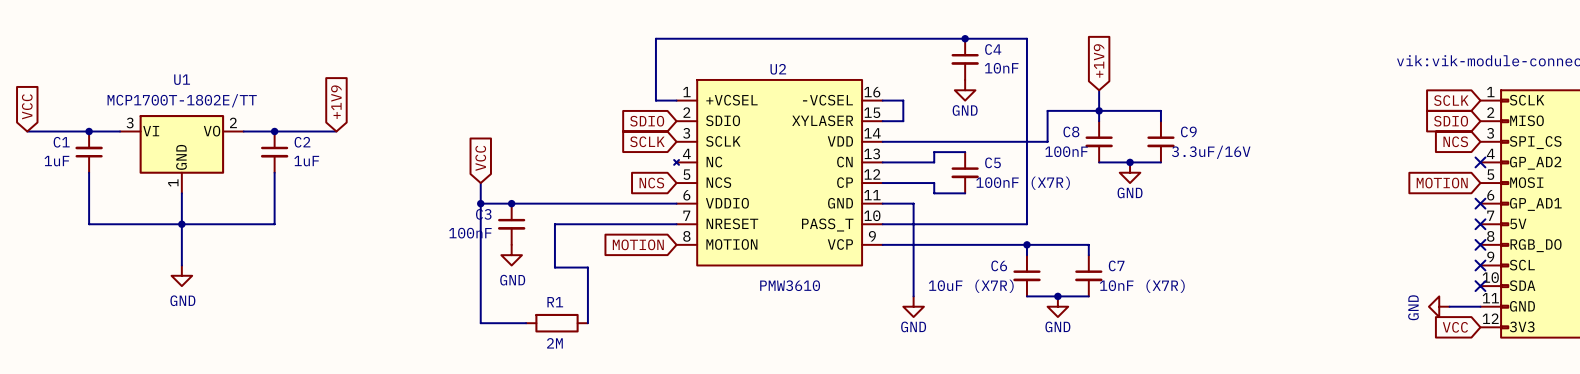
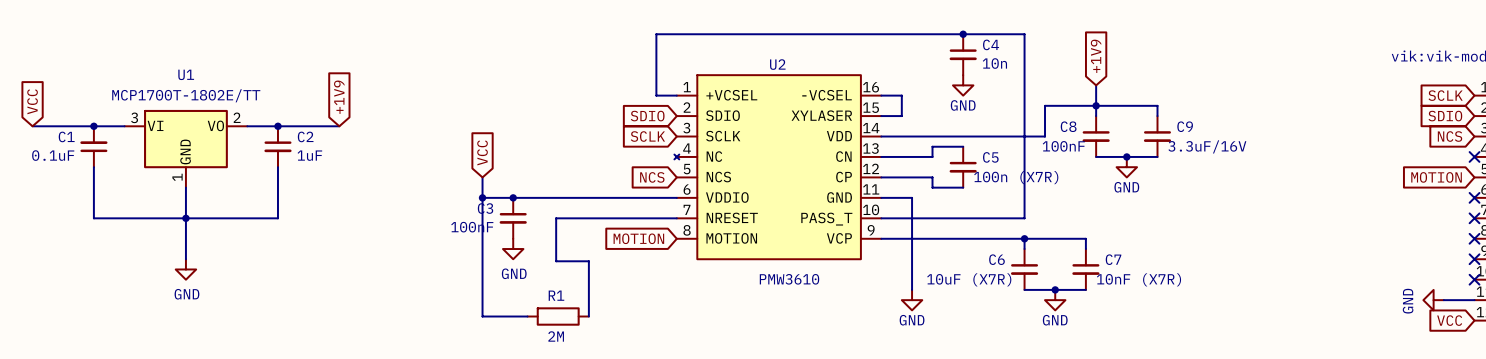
C4 value: 10nF (1001, 68) -> 10n (994, 63)
C1 value: 1uF (56, 161) -> 0.1uF (53, 155)
C5 value: 100nF (X7R) (1023, 183) -> 100n (X7R) (1016, 177)

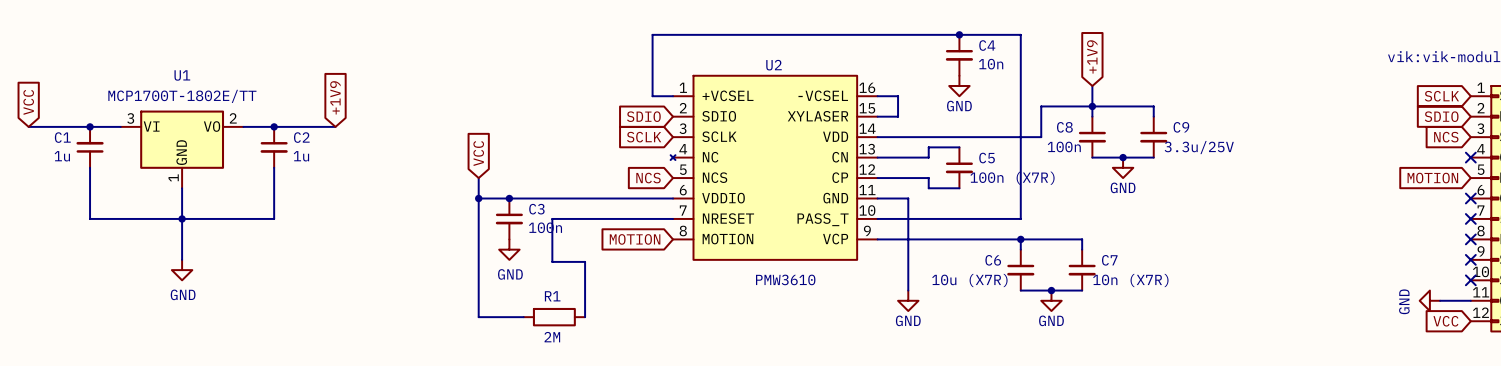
C8 value: 100nF (1063, 146) -> 100n (1064, 146)
C9 value: 3.3uF/16V (1207, 146) -> 3.3u/25V (1199, 147)
C1 value: 0.1uF (53, 155) -> 1u (62, 156)
C2 value: 1uF (309, 155) -> 1u (301, 156)
C3 name position: C3 (485, 208) -> C3 (536, 209)
C3 value: 100nF (472, 227) -> 100n (545, 227)
C6 value: 10uF (X7R) (969, 279) -> 10u (X7R) (969, 280)
C7 value: 10nF (X7R) (1138, 279) -> 10n (X7R) (1130, 280)

